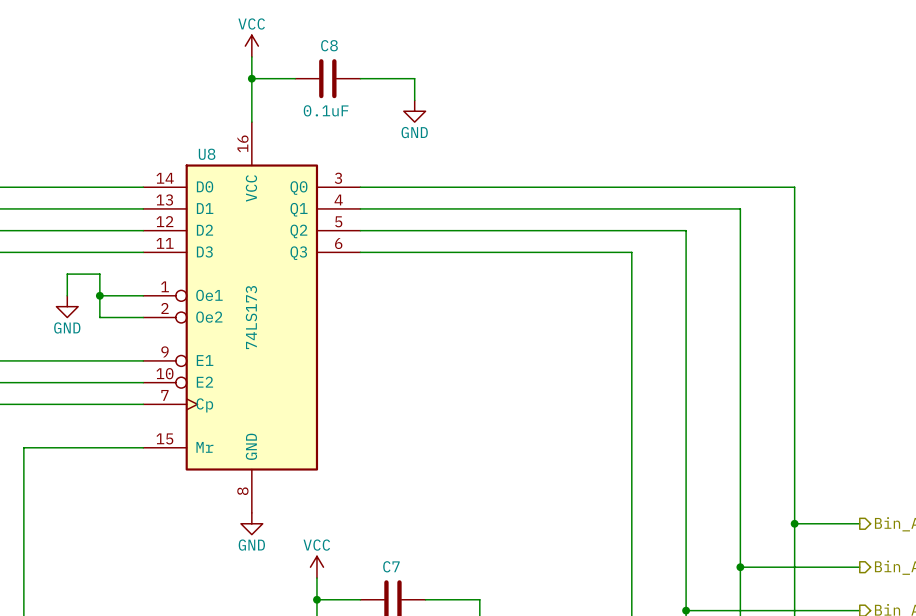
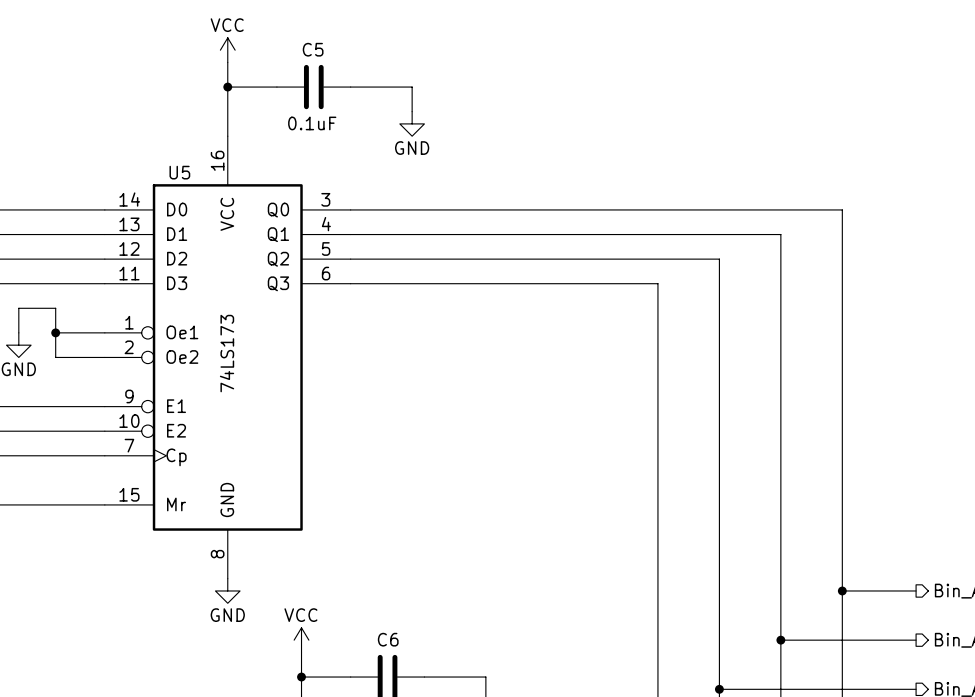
C8 name: C8 (329, 45) -> C5 (313, 49)
U8 name: U8 (207, 154) -> U5 (179, 172)
C7 name: C7 (391, 566) -> C6 (388, 639)

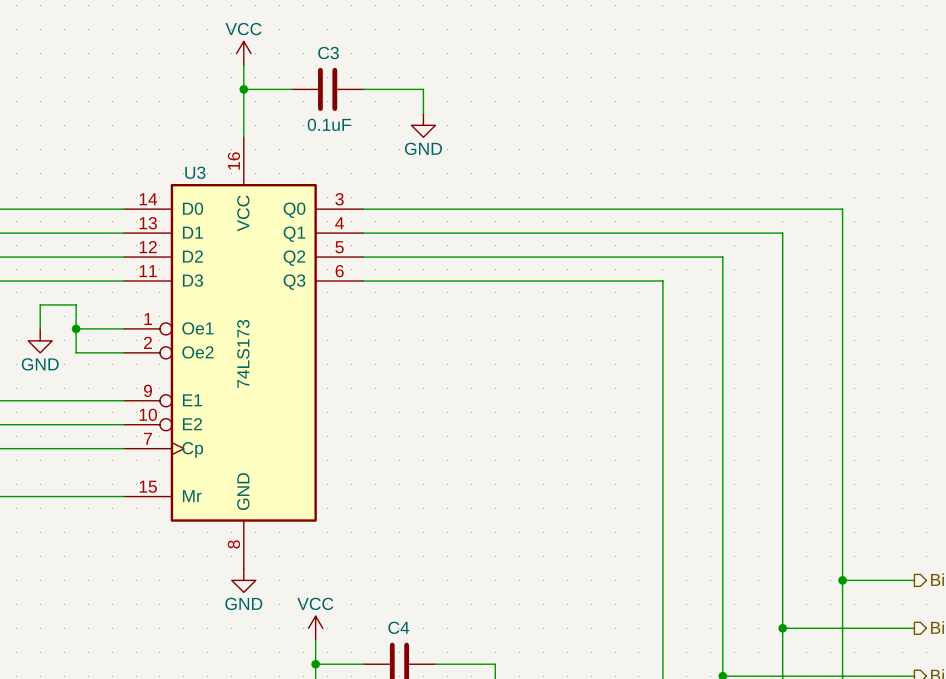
C5 name: C5 (313, 49) -> C3 (328, 53)
U5 name: U5 (179, 172) -> U3 (195, 172)
C6 name: C6 (388, 639) -> C4 (398, 627)

